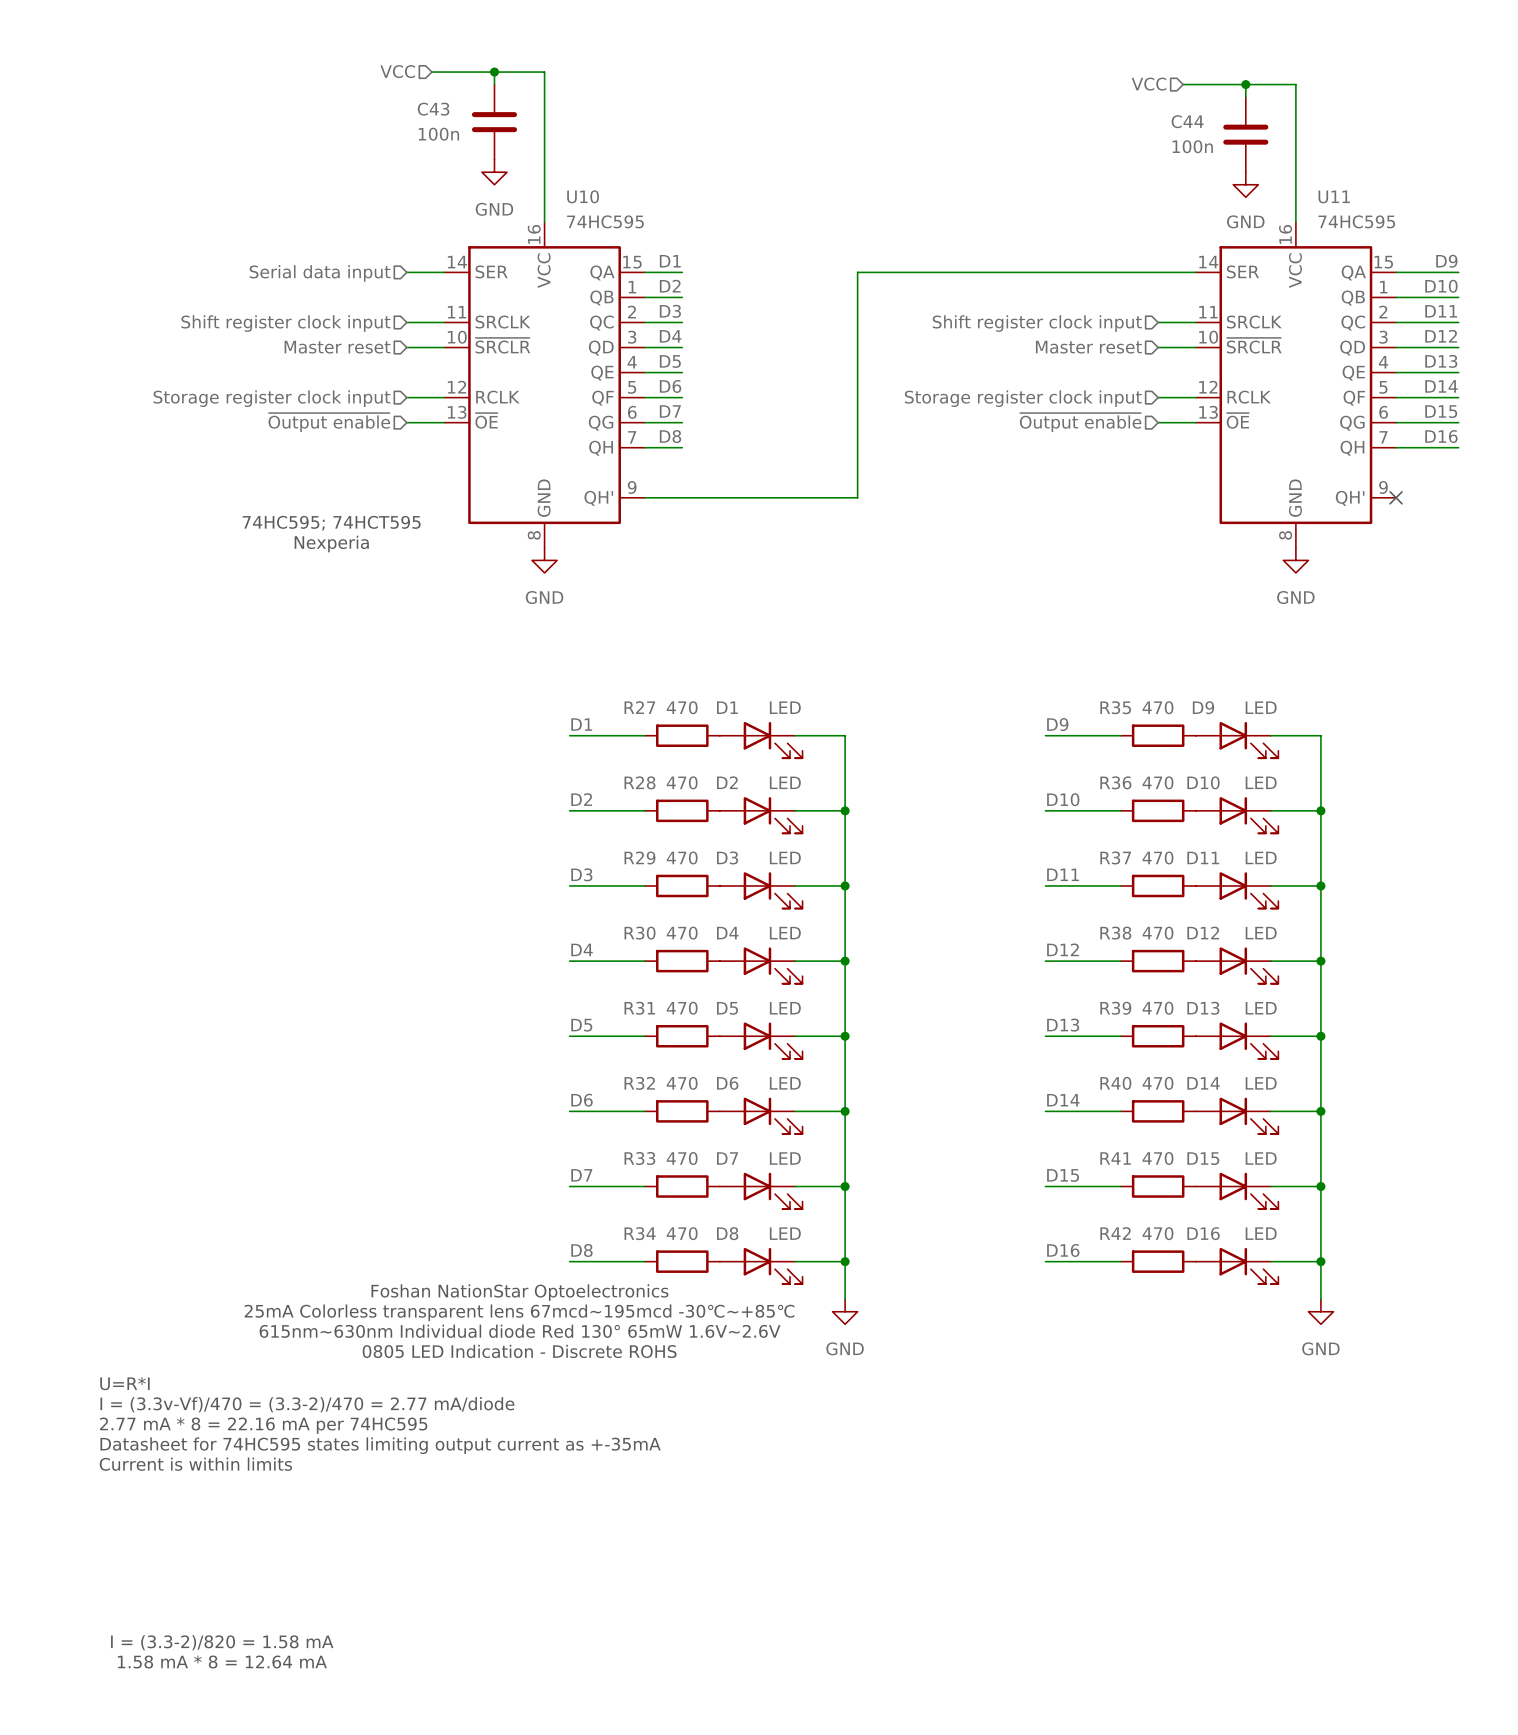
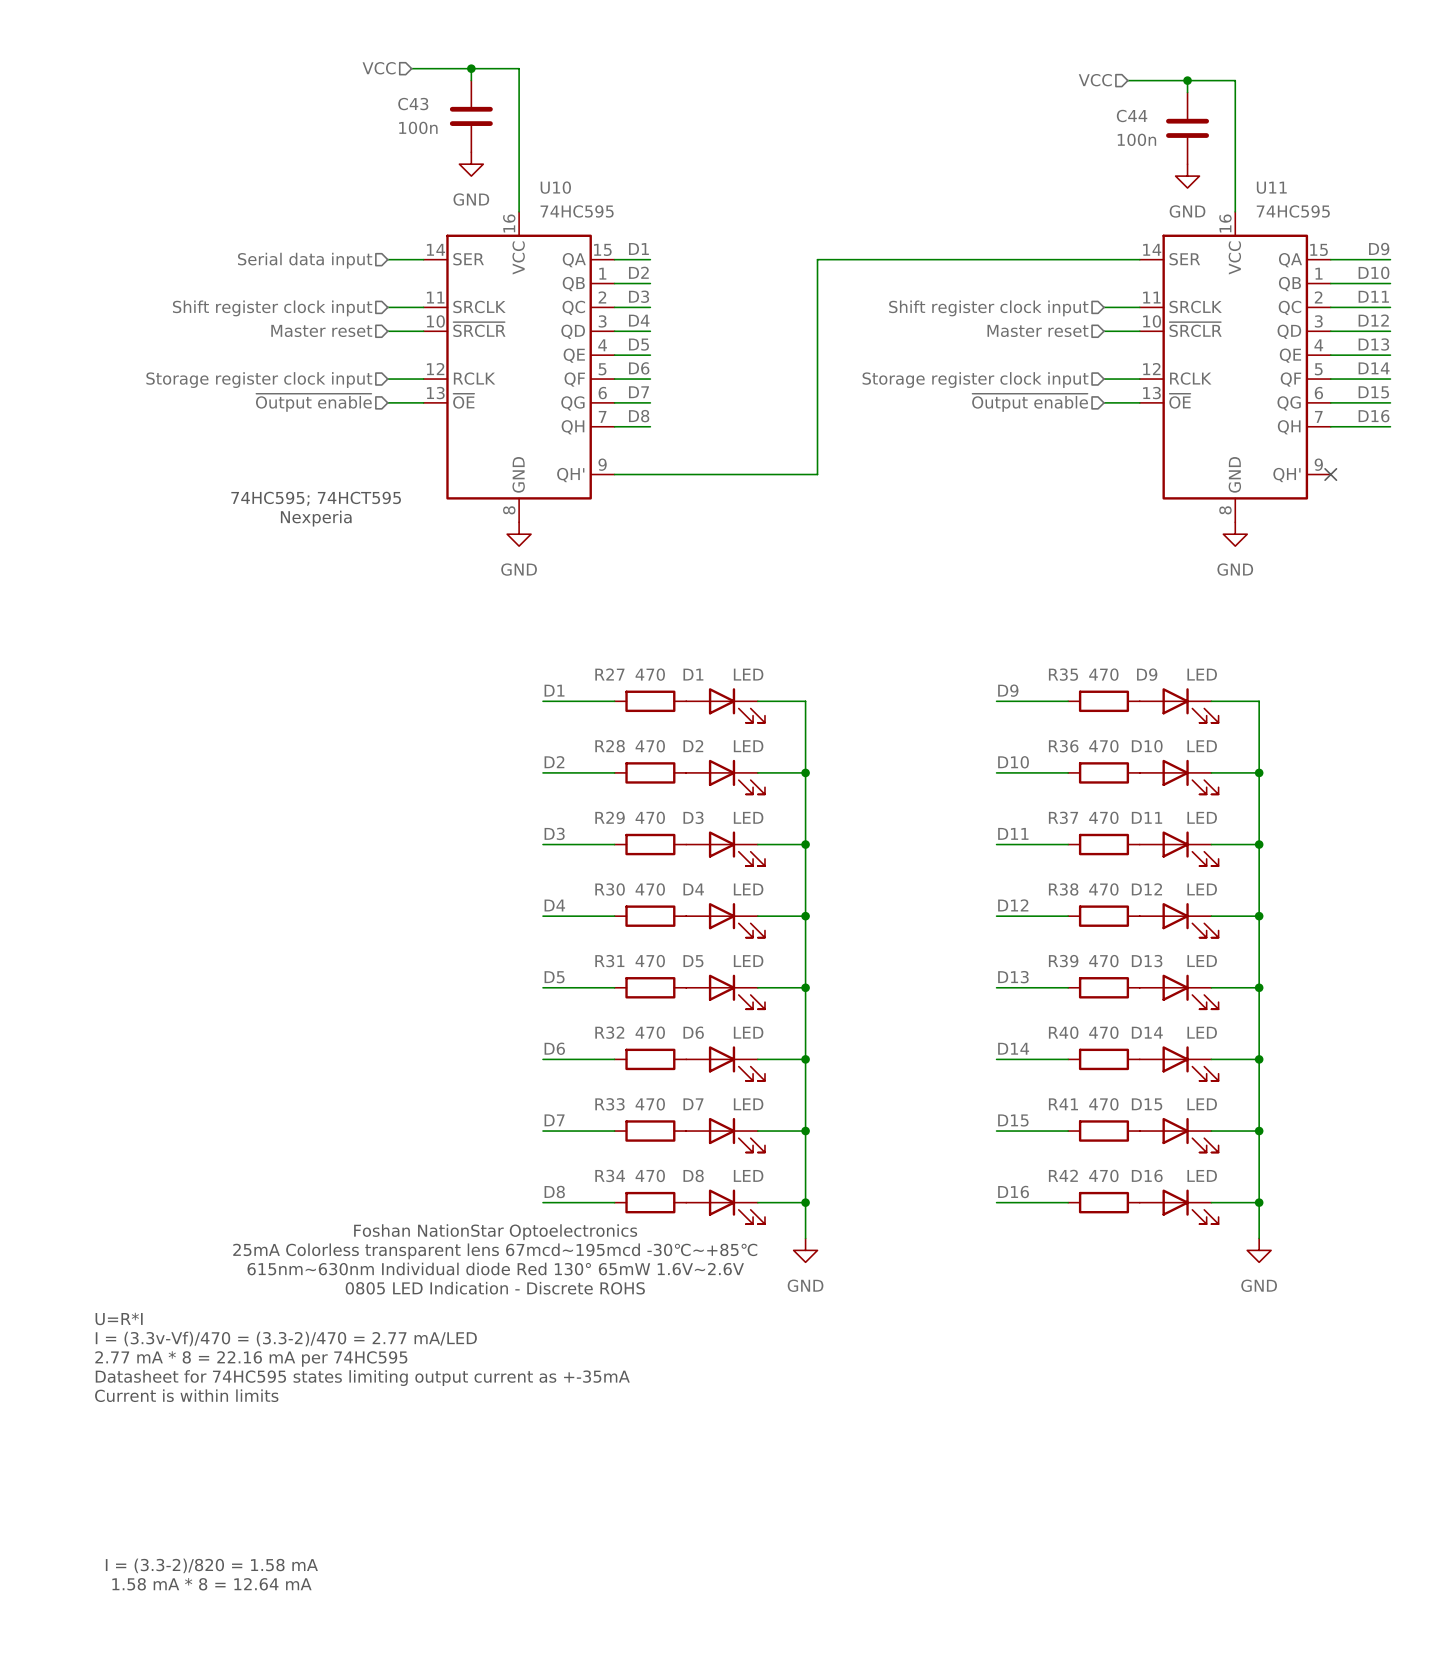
text: I = (3.3v-Vf)/470 = (3.3-2)/470 = 2.77 mA/diode (307, 1404) -> I = (3.3v-Vf)/470 = (3.3-2)/470 = 2.77 mA/LED (286, 1339)

